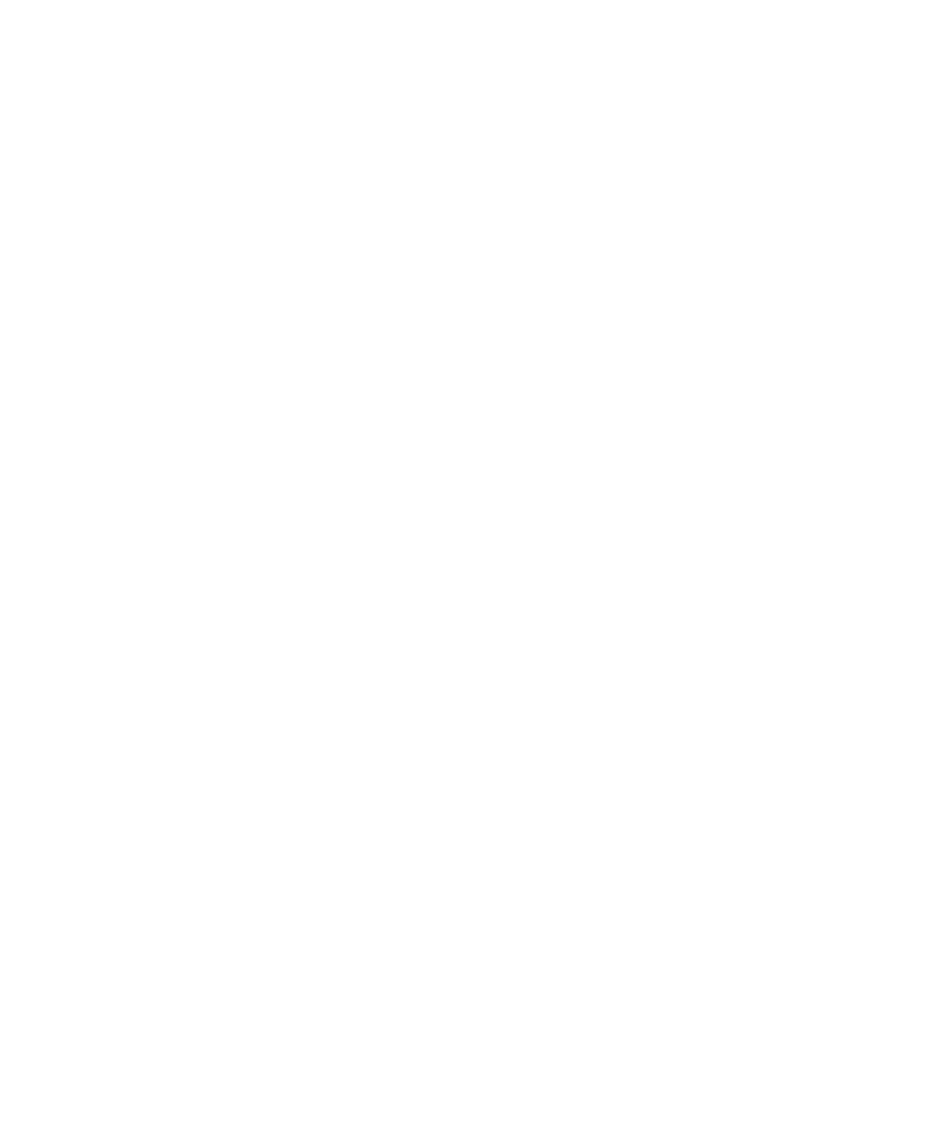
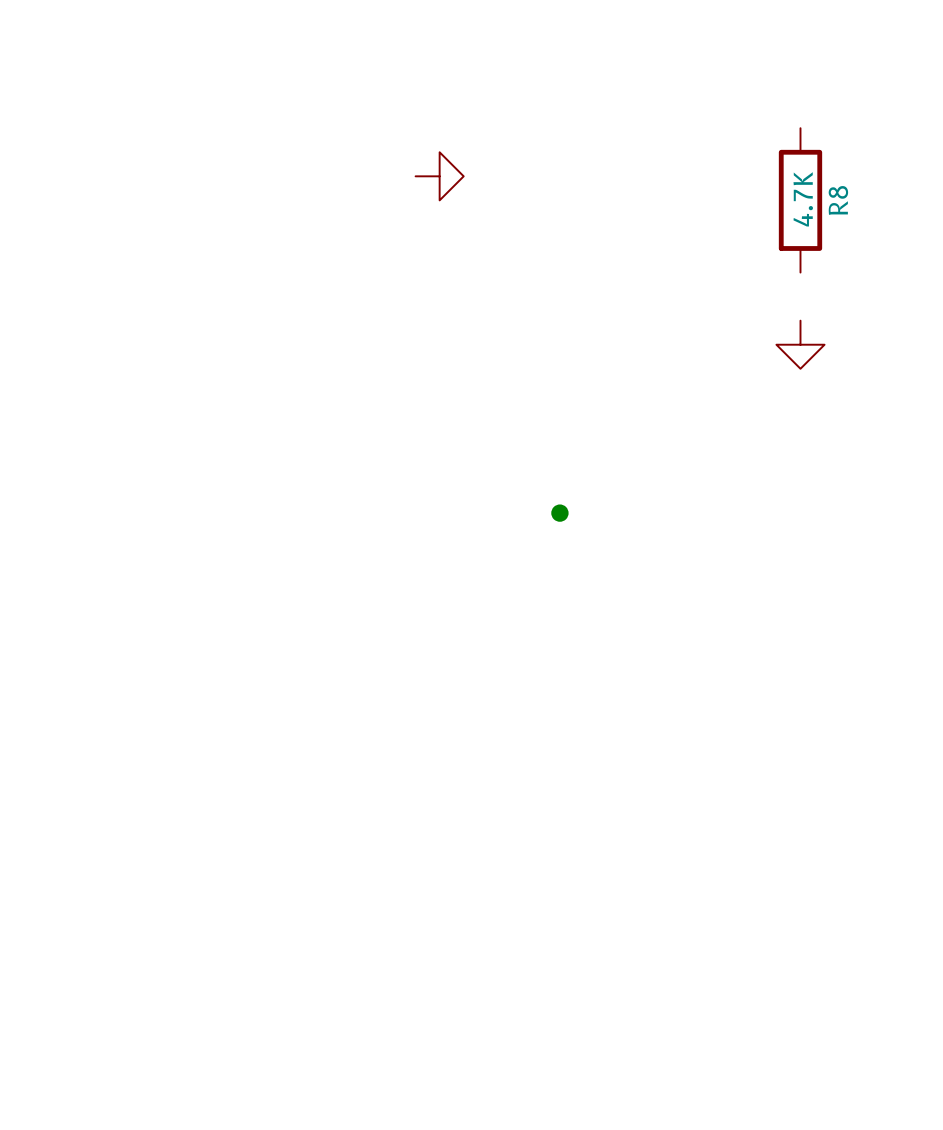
power symbol: none -> (439, 176)
R8: none -> 4.7K (800, 200)
power symbol: none -> (800, 344)
junction: none -> (559, 513)

